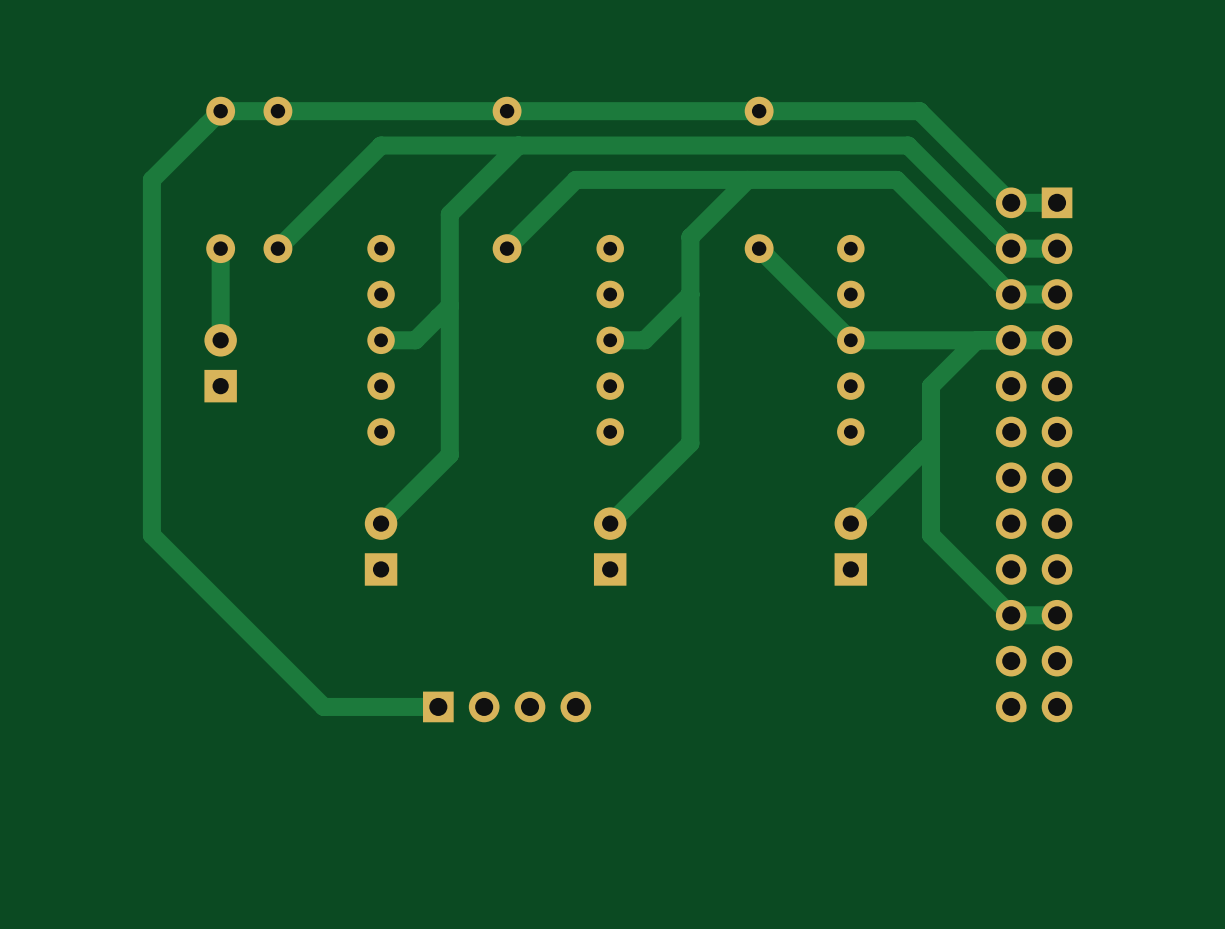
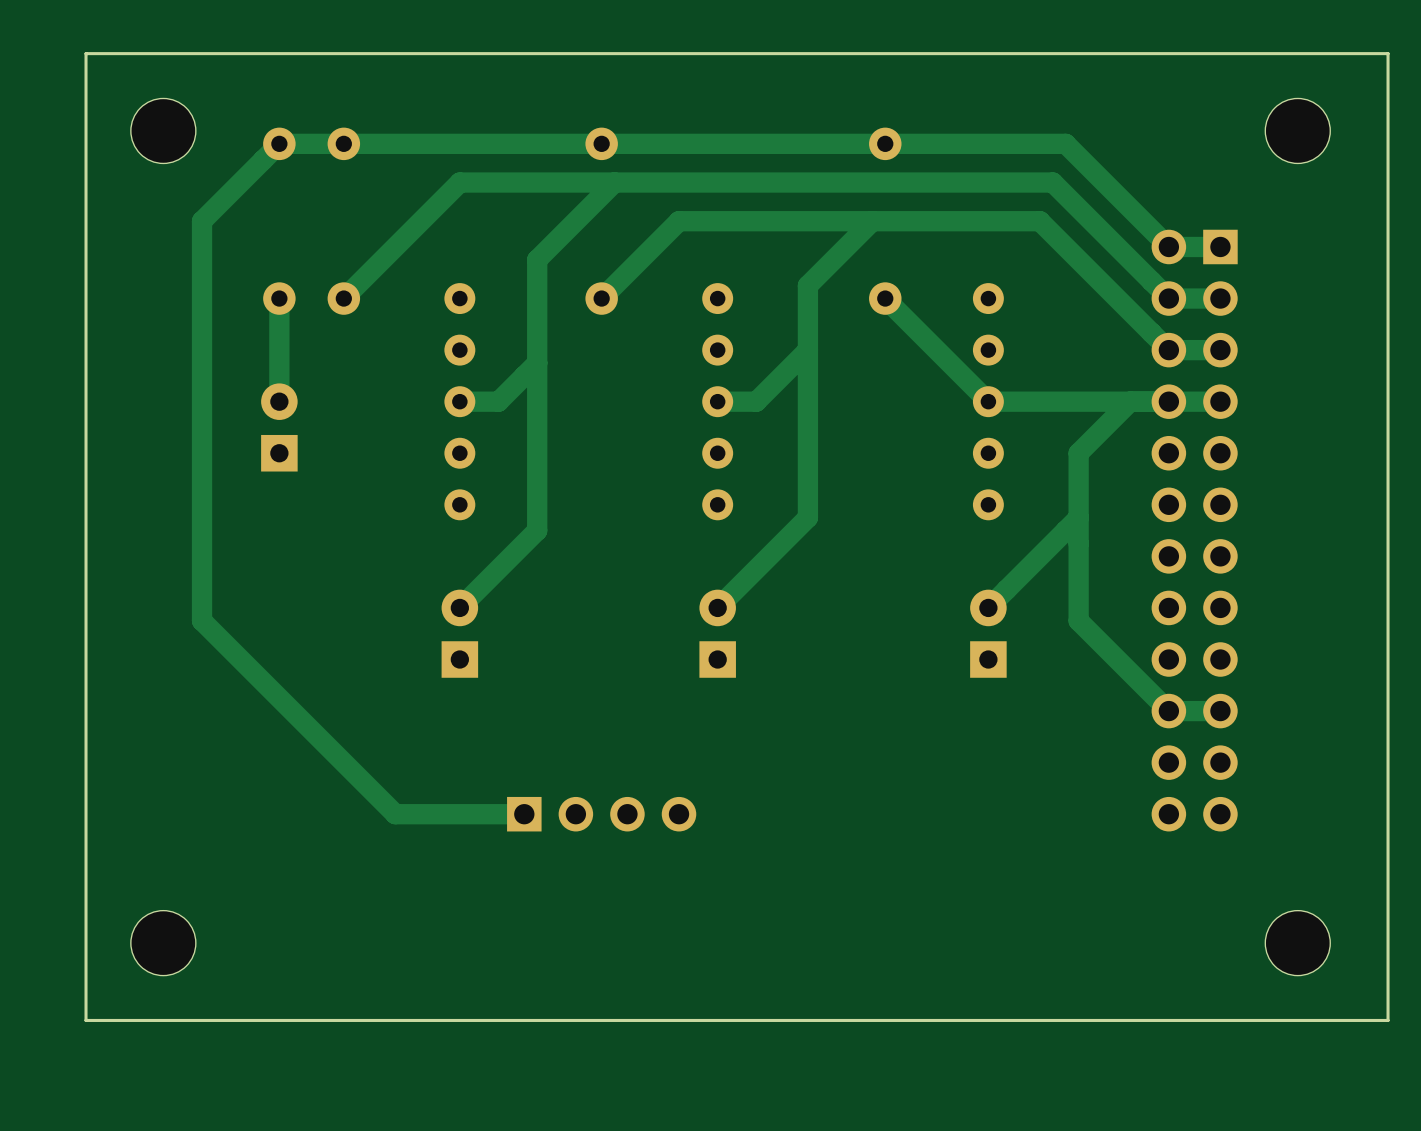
board edge: none -> (1388, 53) (86, 53) (86, 1020) (1388, 1020) (1388, 53)
part: none -> (163, 130)
part: none -> (1297, 130)
part: none -> (163, 943)
part: none -> (1297, 943)

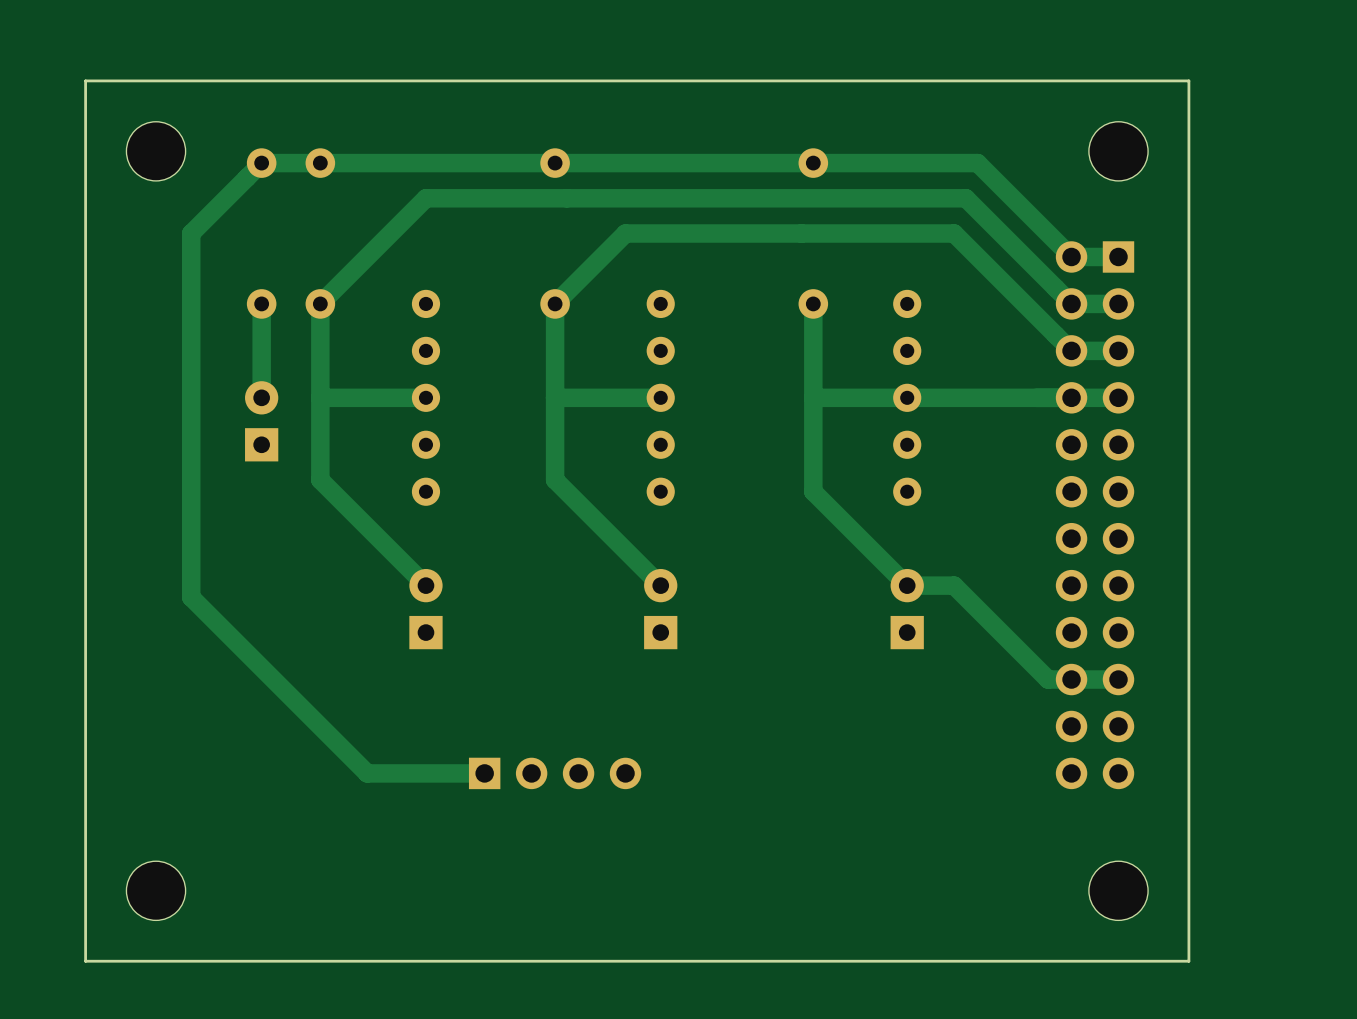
board edge: (1297, 53) (1388, 53) (1388, 1020) (1297, 1020) -> (1188, 80) (1188, 961)
part position: (1297, 130) -> (1118, 151)
track: (614, 182) (537, 259) (537, 530) (459, 607) -> (320, 303) (320, 479) (425, 585)
track: (872, 221) (807, 285) (807, 517) (717, 607) -> (555, 303) (555, 479) (660, 585)
track: (885, 298) (988, 401) -> (813, 397) (907, 397)
track: (807, 350) (756, 401) (717, 401) -> (555, 397) (660, 397)
track: (537, 363) (498, 401) (459, 401) -> (320, 397) (425, 397)
track: (1130, 401) (1078, 453) (1078, 620) (1168, 711) -> (813, 303) (813, 491) (907, 585) (954, 585) (1048, 679) (1071, 679)
track: (1078, 517) (988, 607) -> none
part position: (1297, 943) -> (1118, 890)

